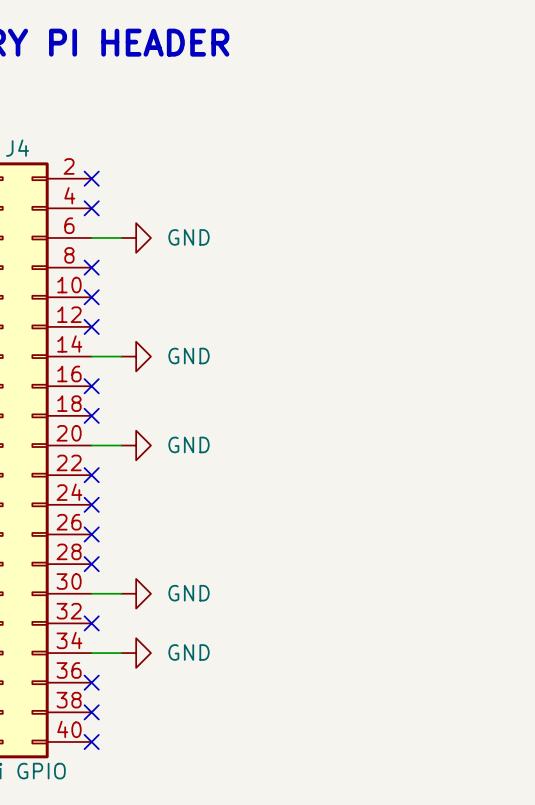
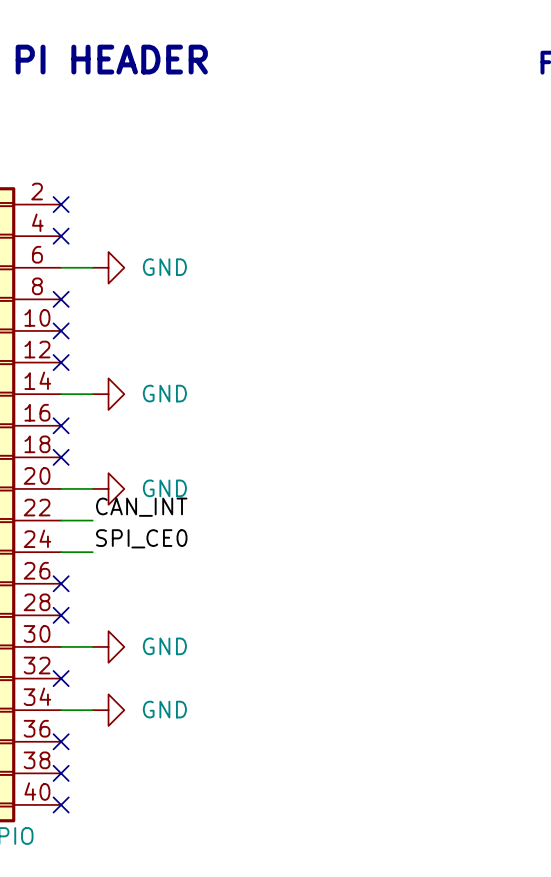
label: none -> CAN_INT (141, 507)
wire: none -> (61, 520) (92, 520)
no-connect mark: (91, 475) -> none
label: none -> SPI_CE0 (141, 538)
wire: none -> (61, 552) (92, 552)
no-connect mark: (91, 504) -> none

